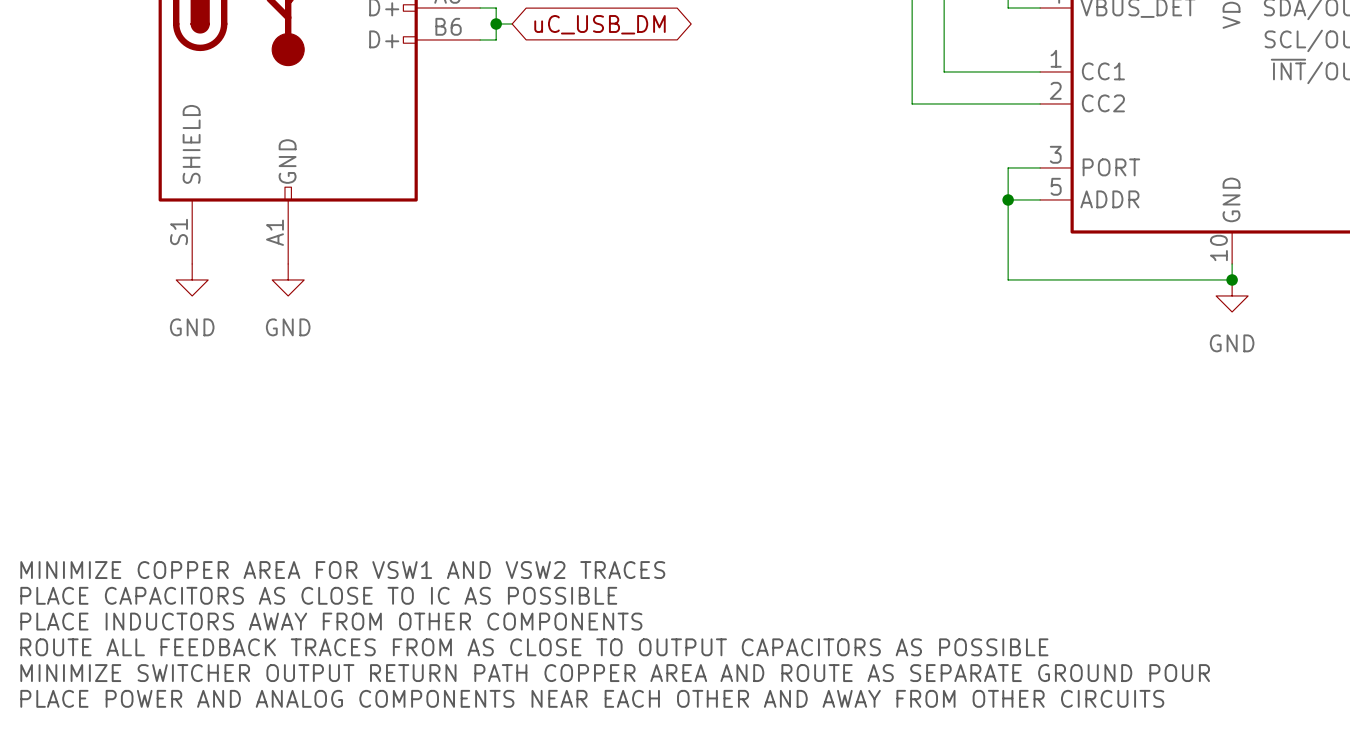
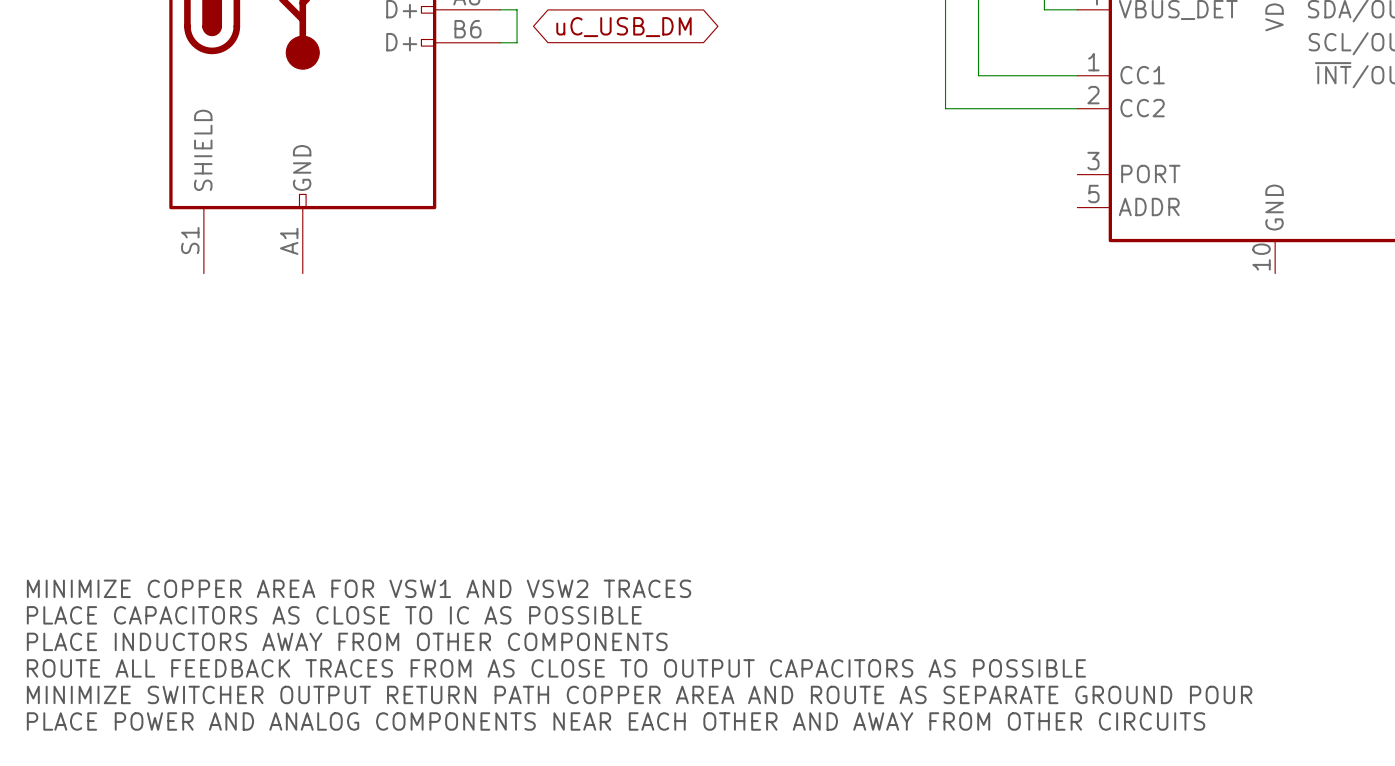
wire: (496, 23) (512, 23) -> none
junction: (496, 23) -> none
wire: (1040, 167) (1008, 167) (1008, 279) (1232, 279) (1232, 263) -> none
wire: (1008, 199) (1040, 199) -> none
junction: (1008, 199) -> none
power symbol: GND (192, 279) -> none
power symbol: GND (288, 279) -> none
junction: (1232, 279) -> none
power symbol: GND (1232, 295) -> none

